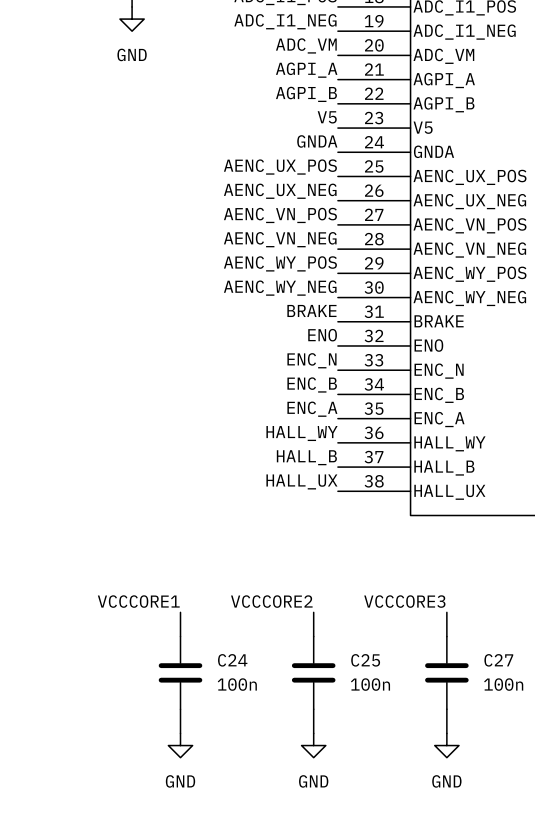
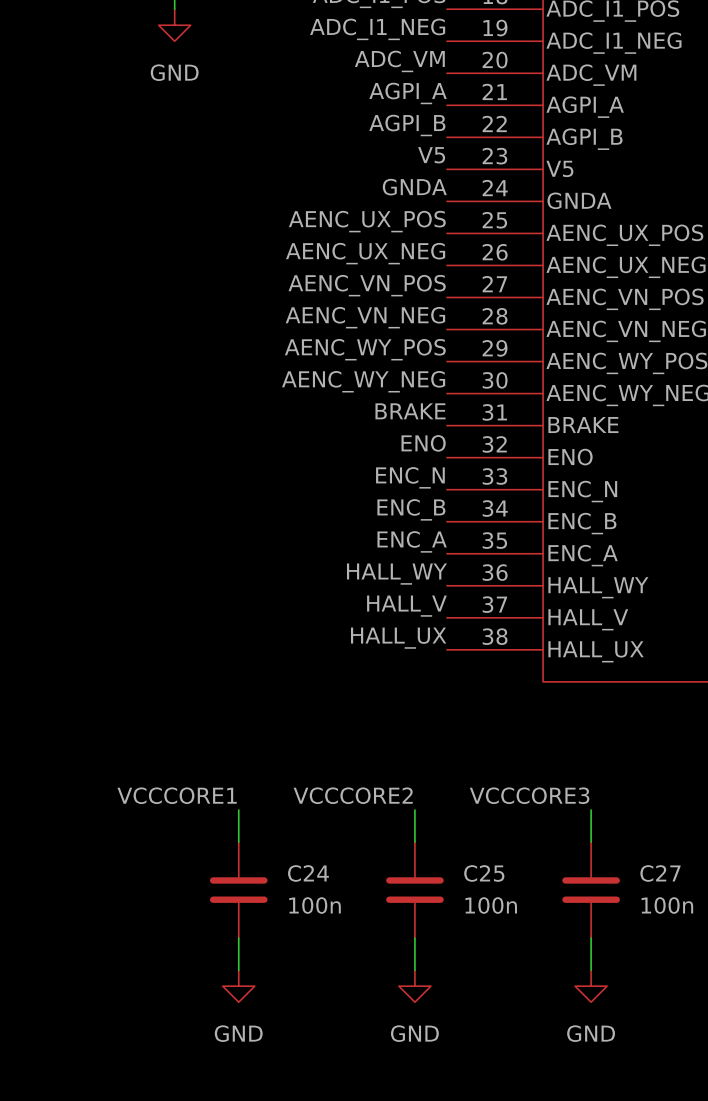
label: HALL_B (306, 457) -> HALL_V (406, 606)
part pin name: HALL_B (444, 468) -> HALL_V (588, 619)

